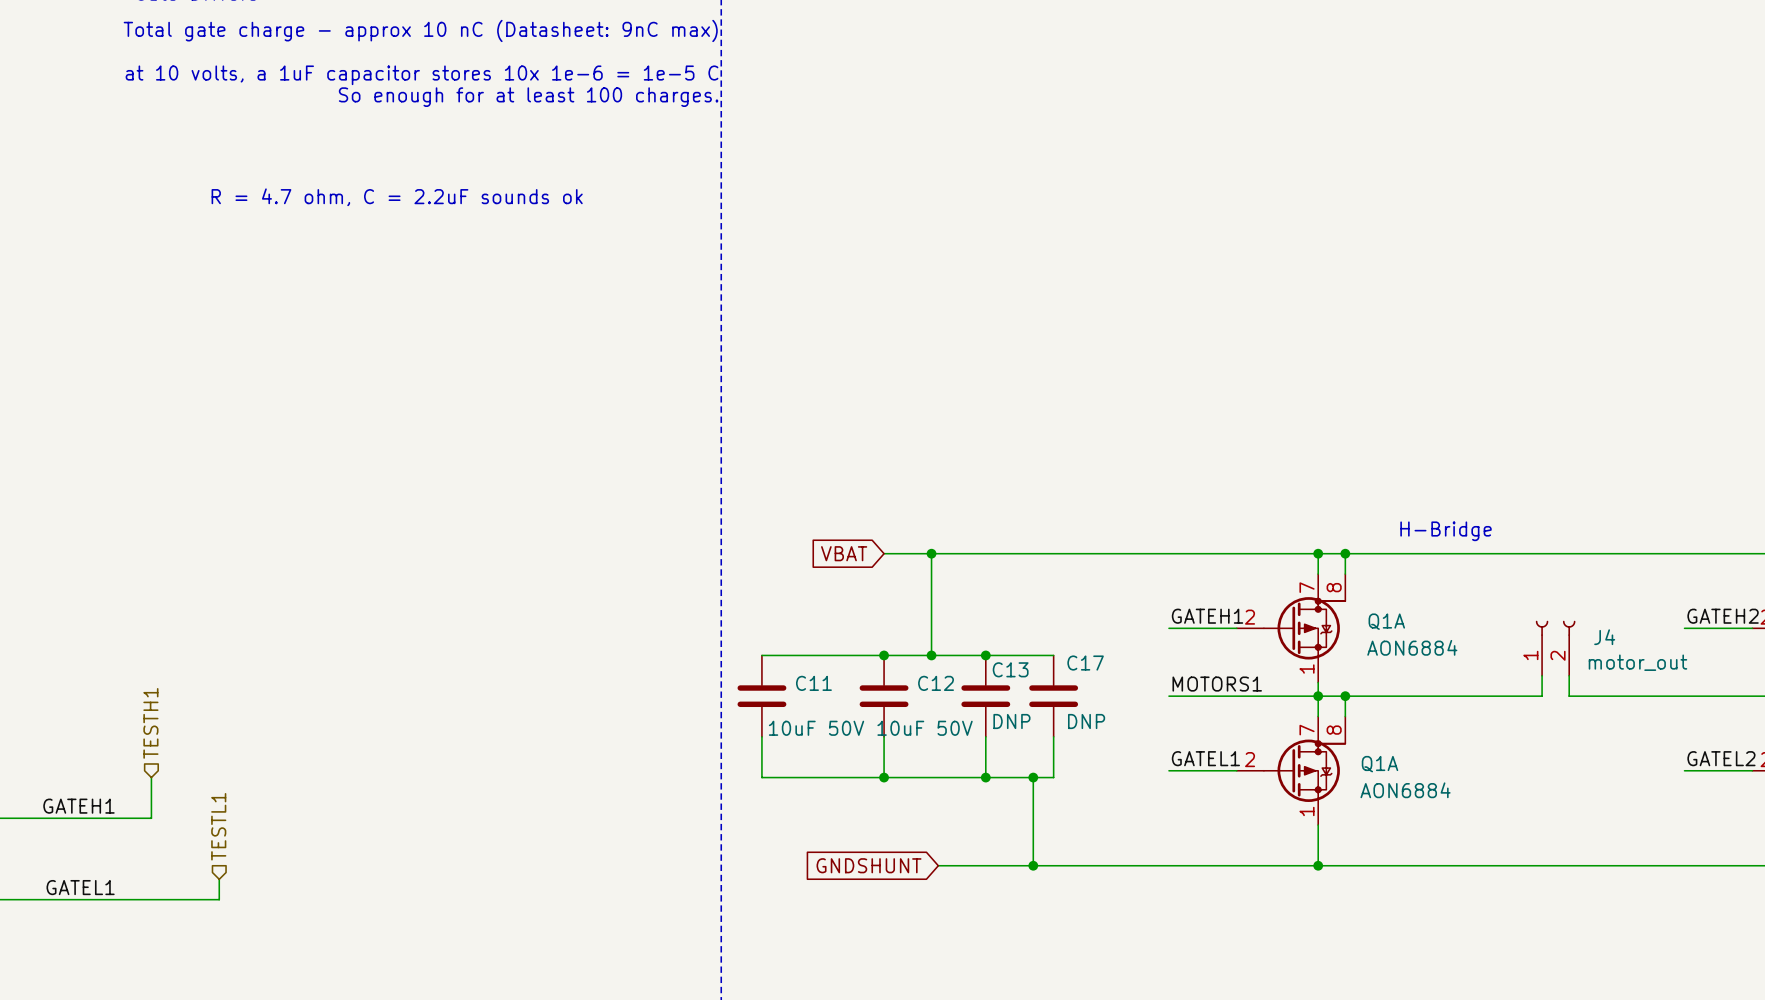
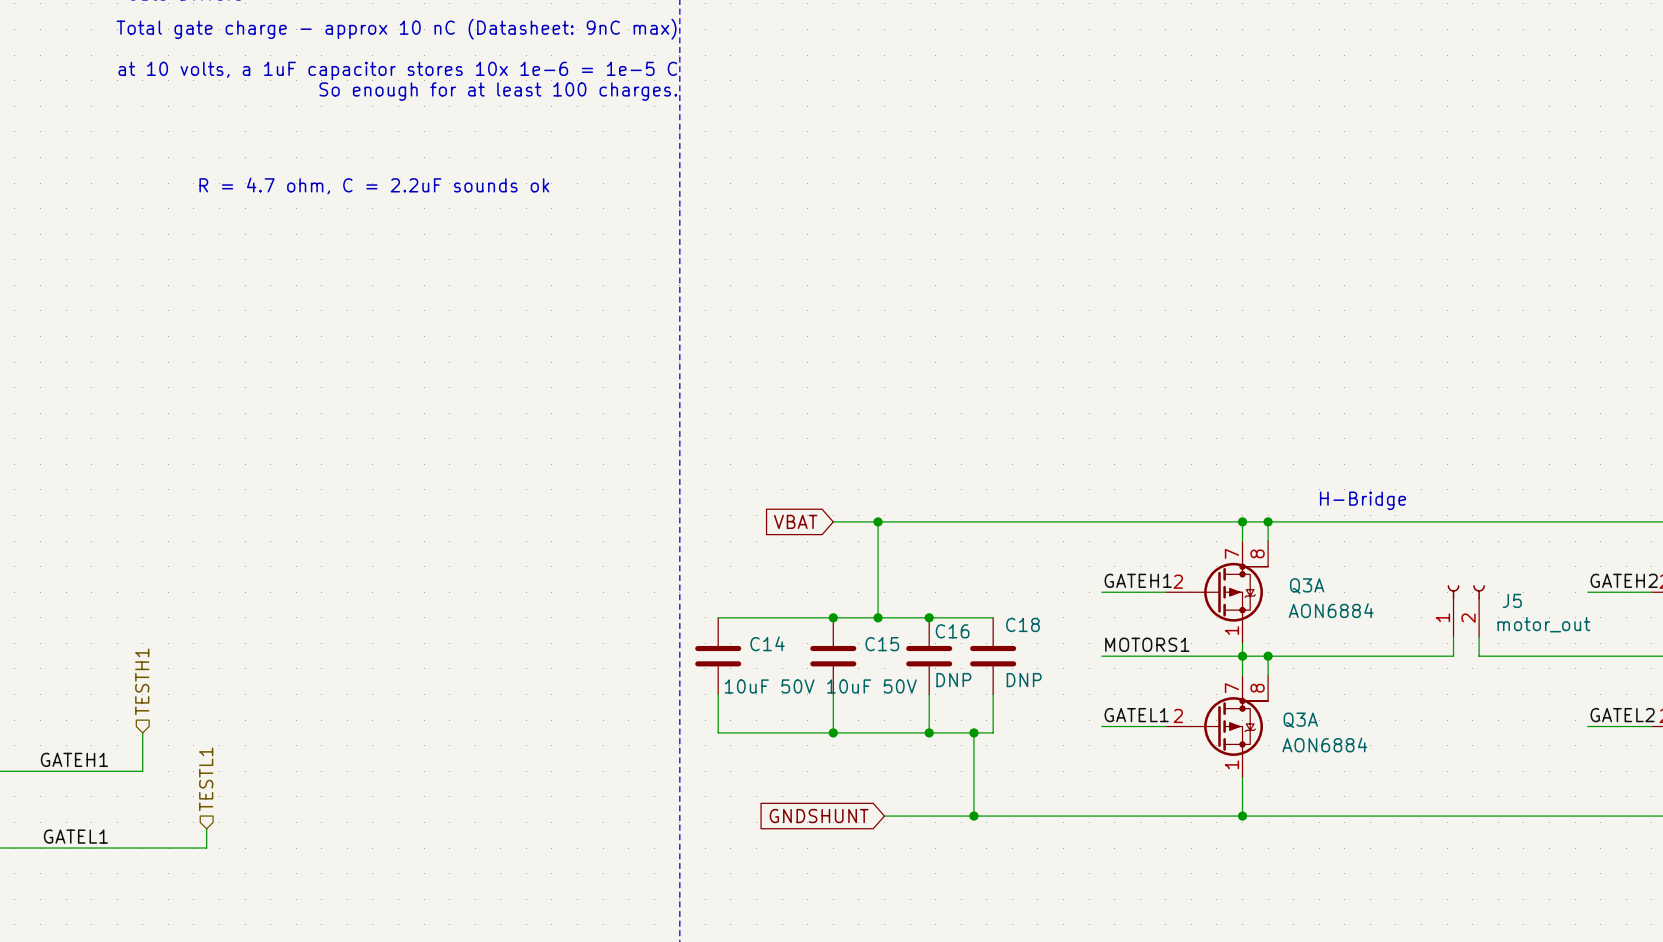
Q1A name: Q1A (1386, 621) -> Q3A (1307, 585)
J4 name: J4 (1604, 637) -> J5 (1512, 600)
C17 name: C17 (1085, 663) -> C18 (1022, 624)
C13 name: C13 (1010, 669) -> C16 (952, 631)
C11 name: C11 (813, 683) -> C14 (767, 643)
C12 name: C12 (936, 683) -> C15 (882, 644)
Q1A name: Q1A (1380, 764) -> Q3A (1300, 720)

